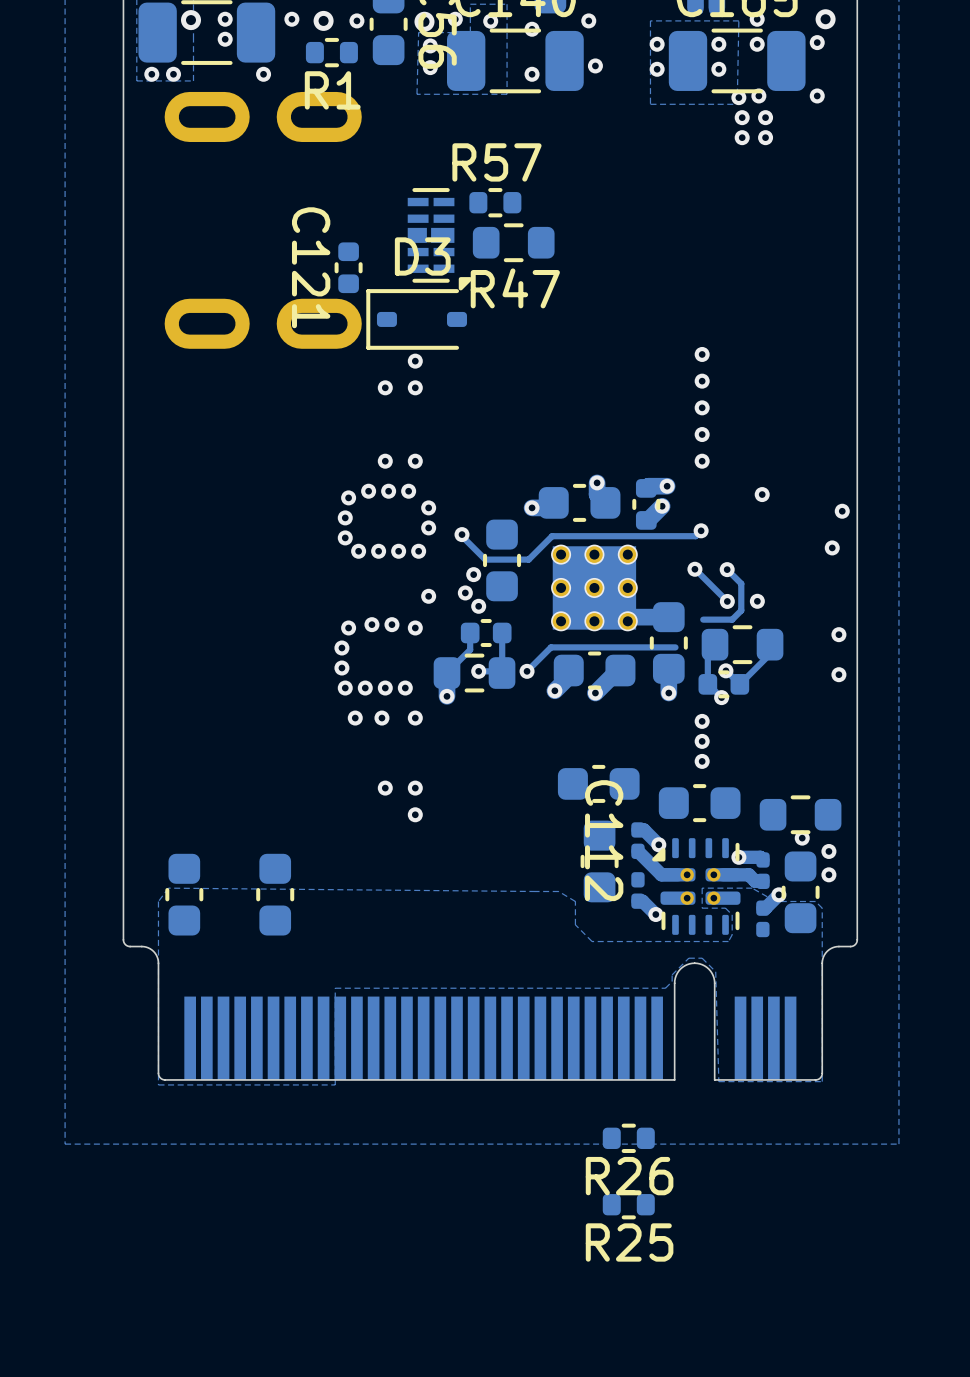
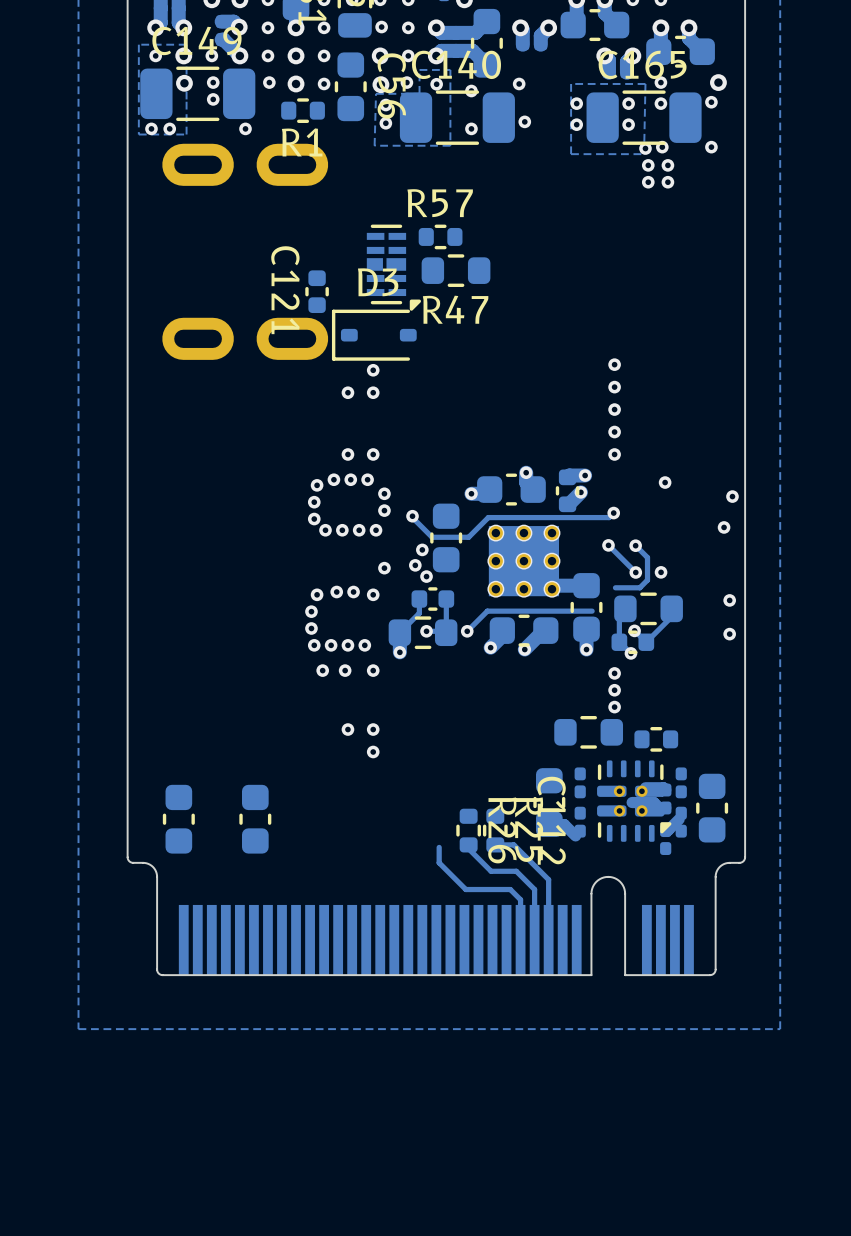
part: (598, 783) -> none
part: none -> (656, 739)
part: (699, 803) -> none
part position: (800, 814) -> (588, 732)
track: (637, 829) (643, 829) (658, 844) -> none
via: (802, 838) -> none
C112 position: (637, 840) -> (580, 822)
via: (658, 844) -> none
track: (637, 851) (661, 874) (677, 874) -> none
part: none -> (681, 782)
via: (828, 851) -> none
via: (738, 857) -> none
part position: (599, 861) -> (549, 802)
via: (828, 874) -> none
part rotation: 0° (696, 886) -> 180° (634, 801)
zone outline: (752, 888) (775, 901) (815, 901) (822, 908) (822, 1081) (718, 1081) (715, 971) (702, 958) (688, 958) (672, 974) (672, 981) (665, 988) (335, 988) (335, 1084) (158, 1084) (158, 901) (168, 888) (558, 891) (575, 901) (575, 924) (592, 941) (728, 941) (732, 934) (732, 914) (725, 908) (702, 908) (702, 888) (752, 888) -> none
part position: (637, 890) -> (580, 782)
part position: (800, 892) -> (712, 808)
via: (778, 894) -> none
part: none -> (681, 822)
via: (655, 914) -> none
track: none -> (468, 844) (468, 848) (491, 871) (516, 871) (534, 889) (534, 940)
track: none -> (495, 844) (513, 844) (548, 879) (548, 940)
track: none -> (439, 847) (439, 862) (465, 889) (510, 889) (520, 899) (520, 940)
R26 rotation: 0° (628, 1138) -> 90° clockwise (468, 830)
R26 position: (628, 1138) -> (468, 830)
R25 rotation: 0° (628, 1204) -> 90° clockwise (495, 830)
R25 position: (628, 1204) -> (495, 830)

